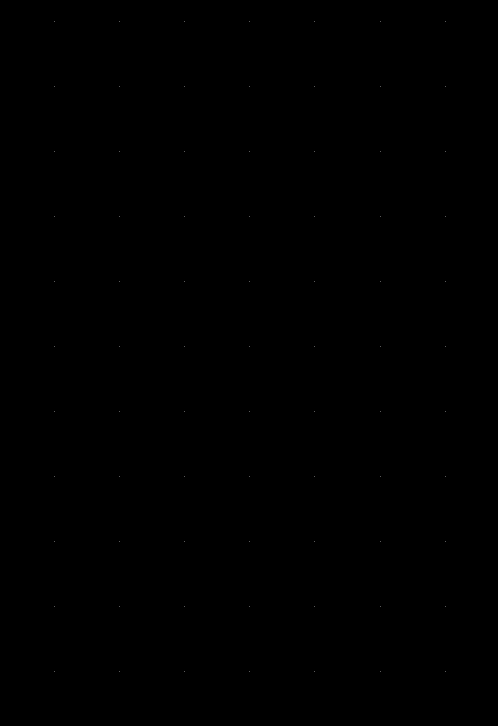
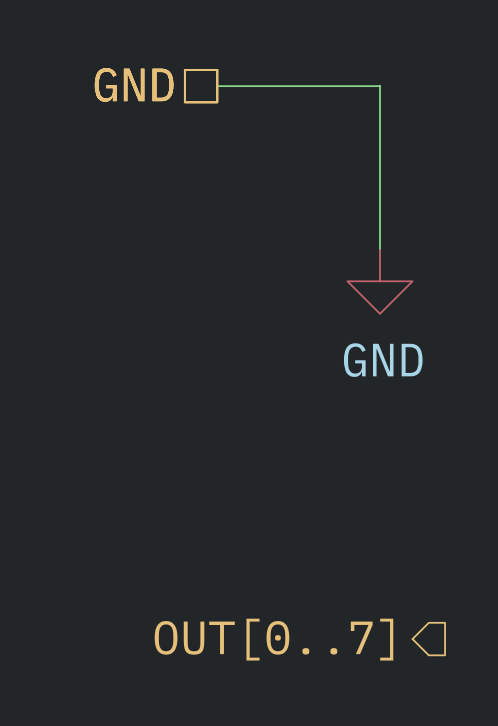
hierarchical label: none -> GND (134, 84)
wire: none -> (217, 86) (380, 86) (380, 248)
power symbol: none -> GND (380, 281)
hierarchical label: none -> OUT[0..7] (273, 639)

